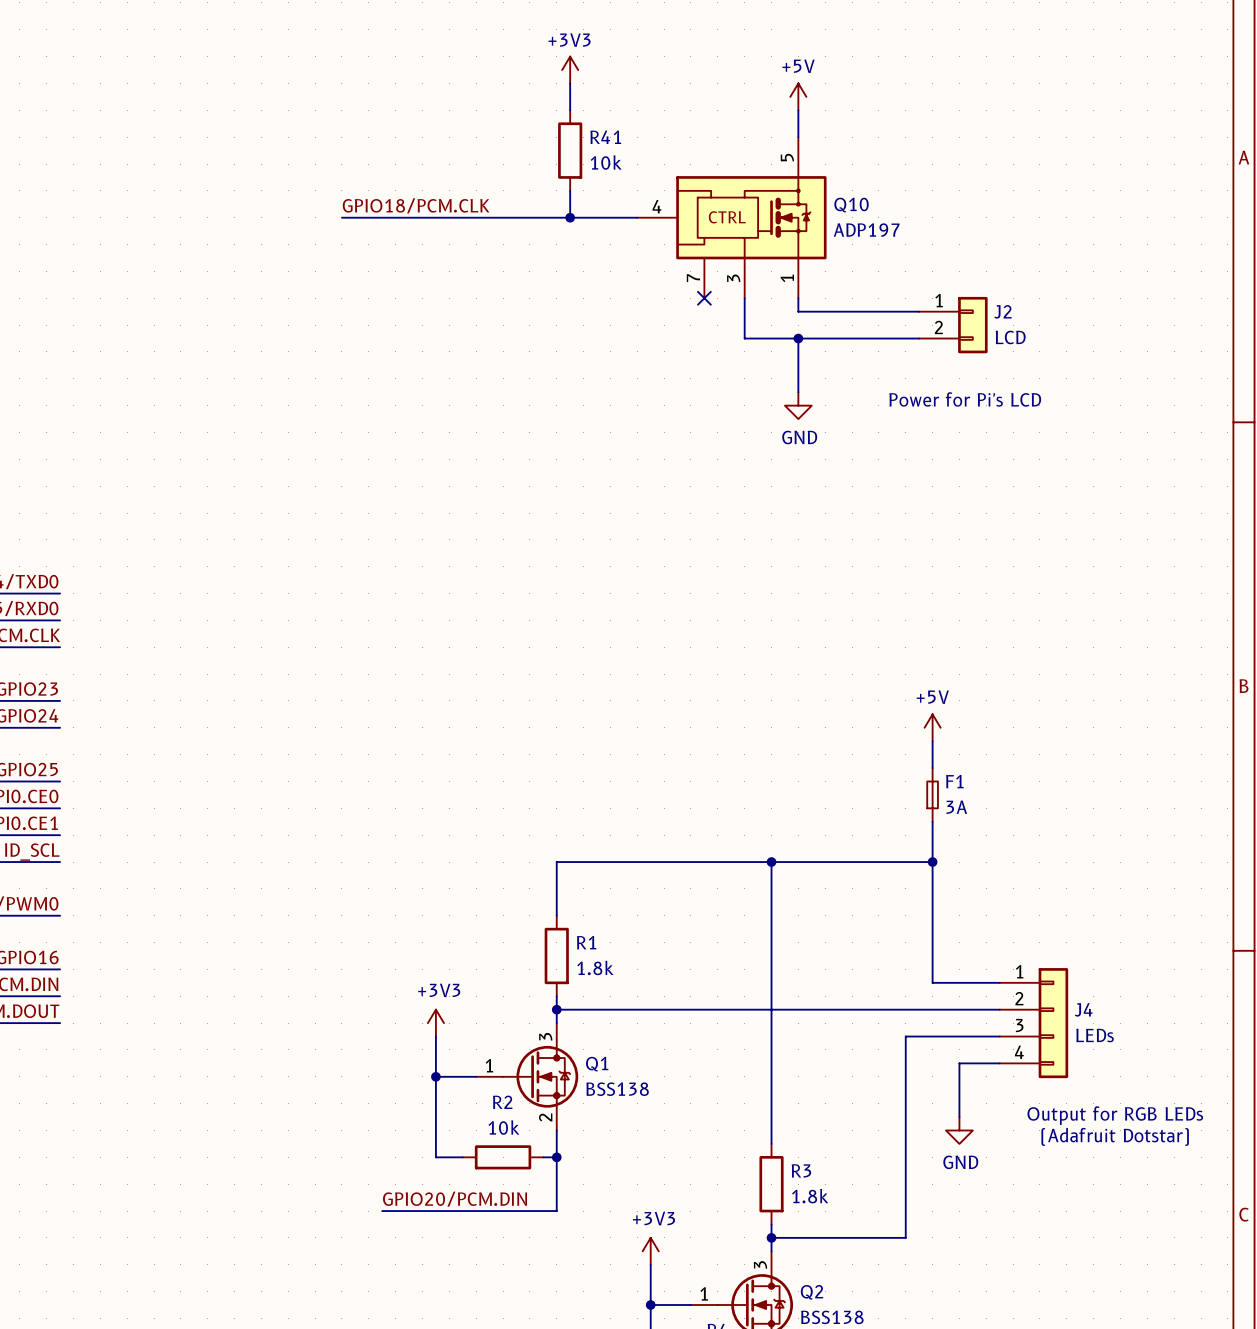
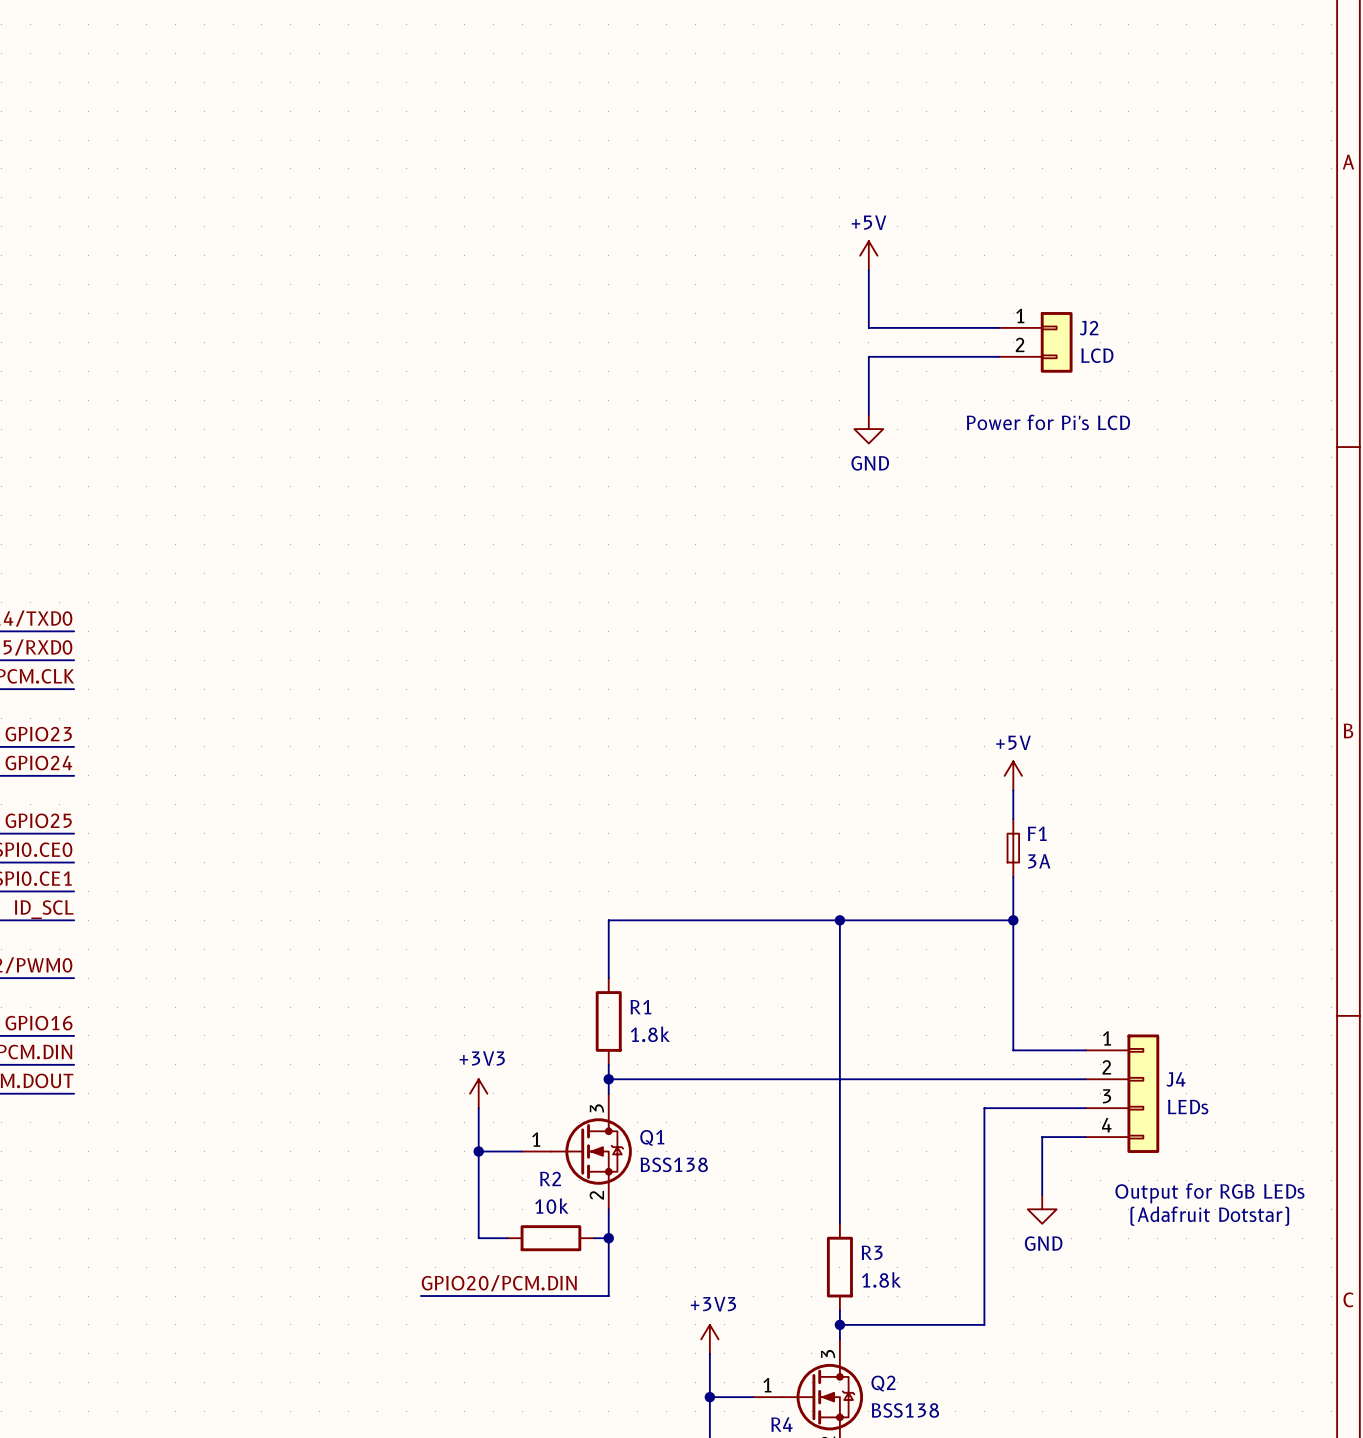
power symbol: +3V3 (570, 70) -> none
wire: (570, 83) (570, 110) -> none
power symbol position: +5V (798, 96) -> +5V (868, 255)
wire: (798, 110) (798, 137) -> none
R41: 10k (570, 150) -> none
wire: (570, 190) (570, 217) -> none
label: GPIO18/PCM.CLK (416, 205) -> none
wire: (341, 217) (637, 217) -> none
junction: (570, 217) -> none
Q10: ADP197 (731, 217) -> none
no-connect mark: (704, 298) -> none
wire: (744, 298) (744, 338) (798, 338) -> none
junction: (798, 338) -> none

